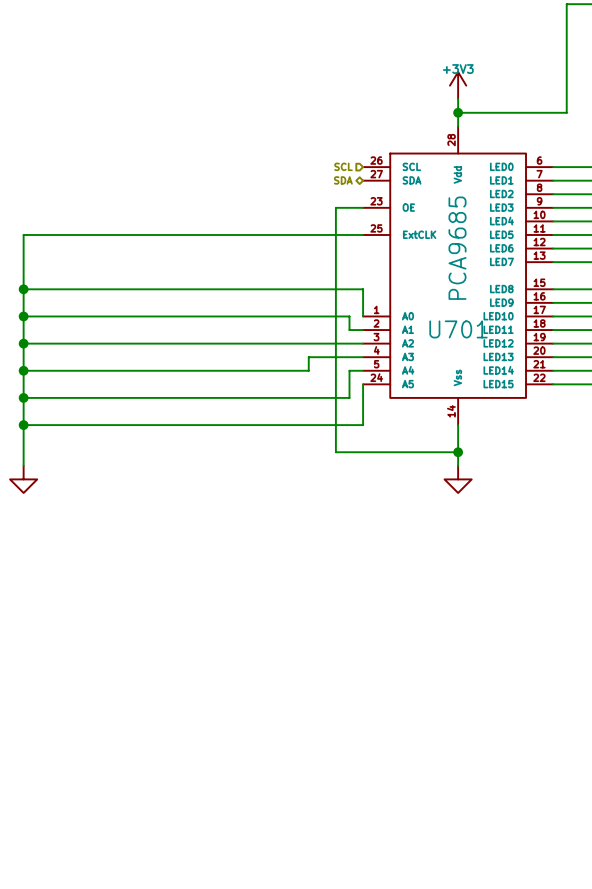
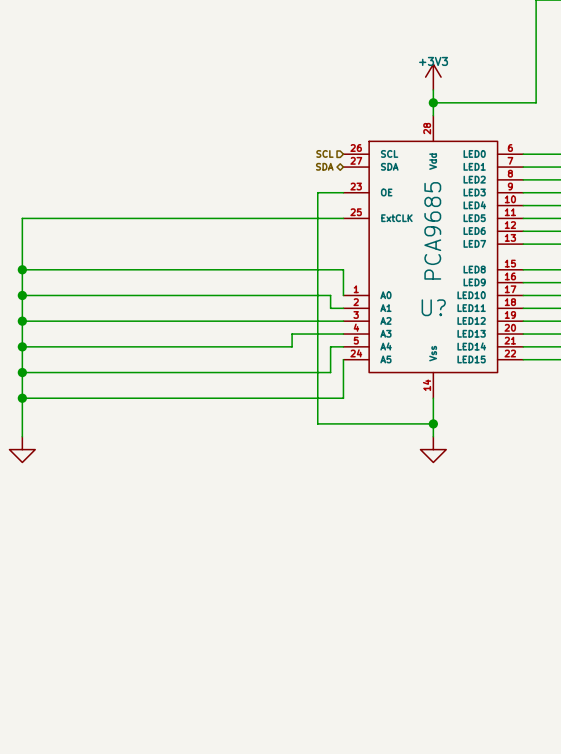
U701 name: U701 (458, 329) -> U? (433, 307)

